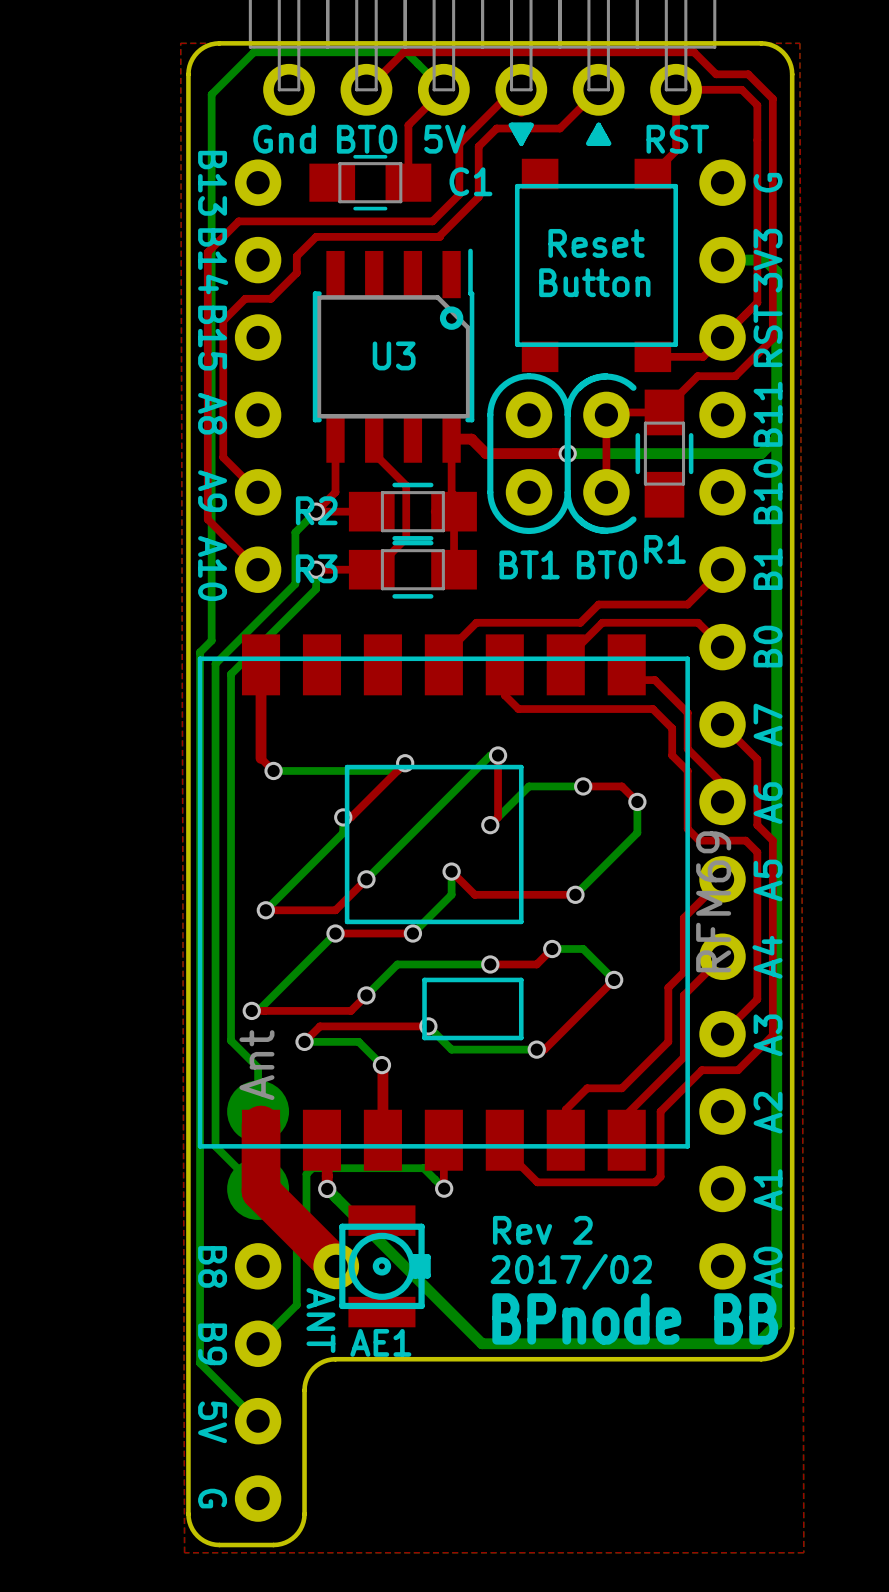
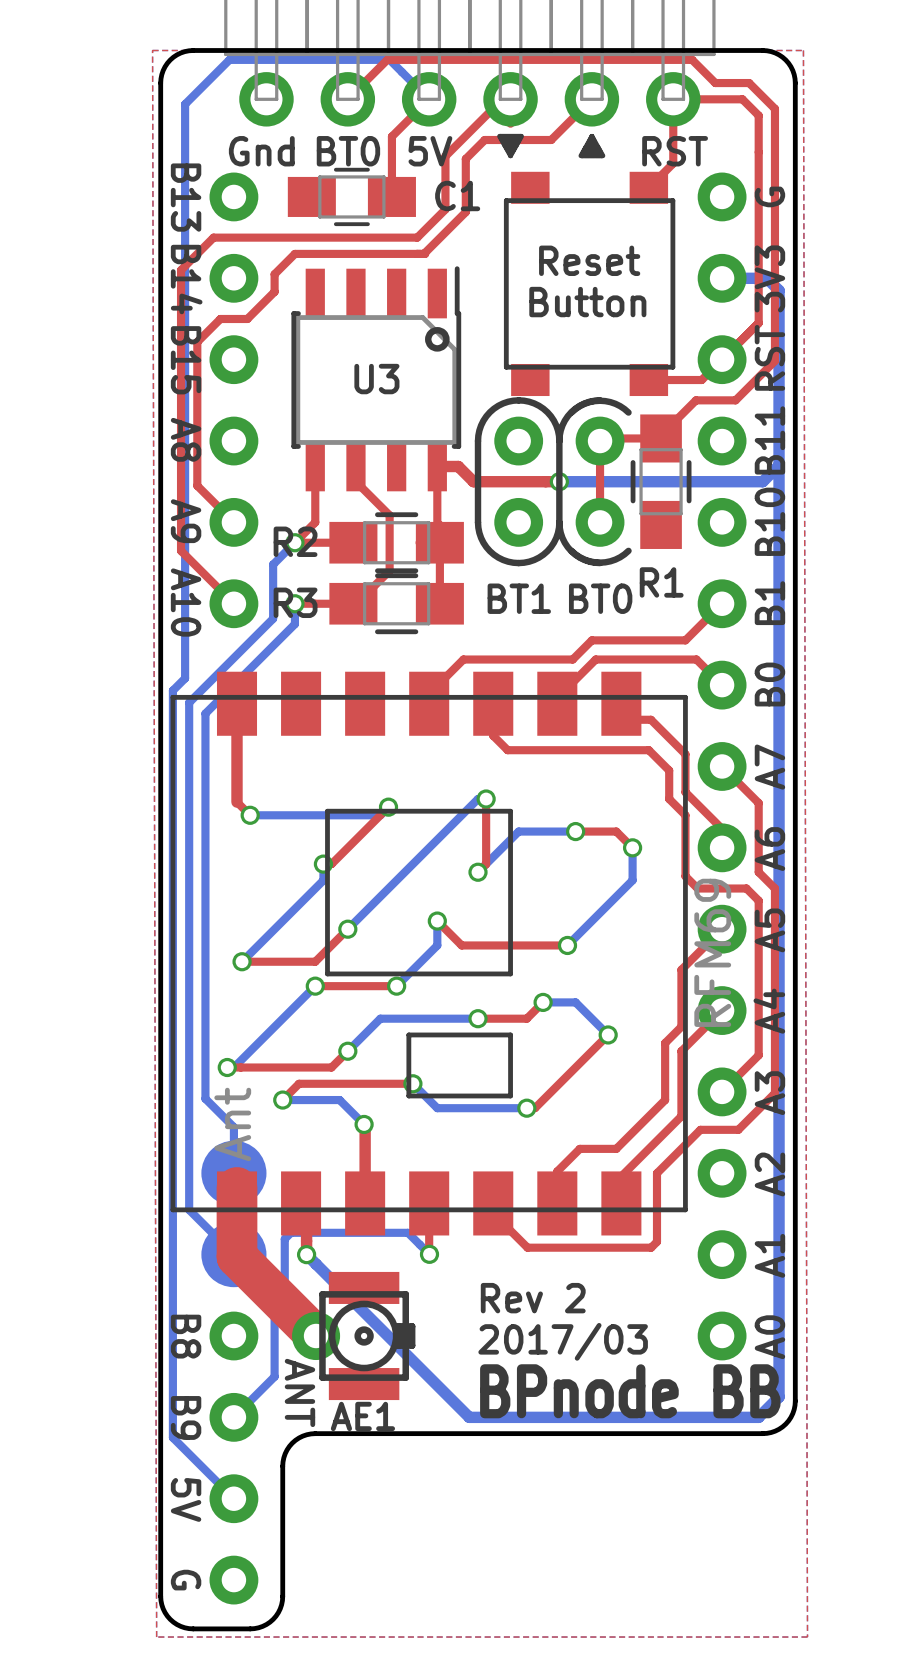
text: 2017/02 (571, 1271) -> 2017/03 (563, 1341)

